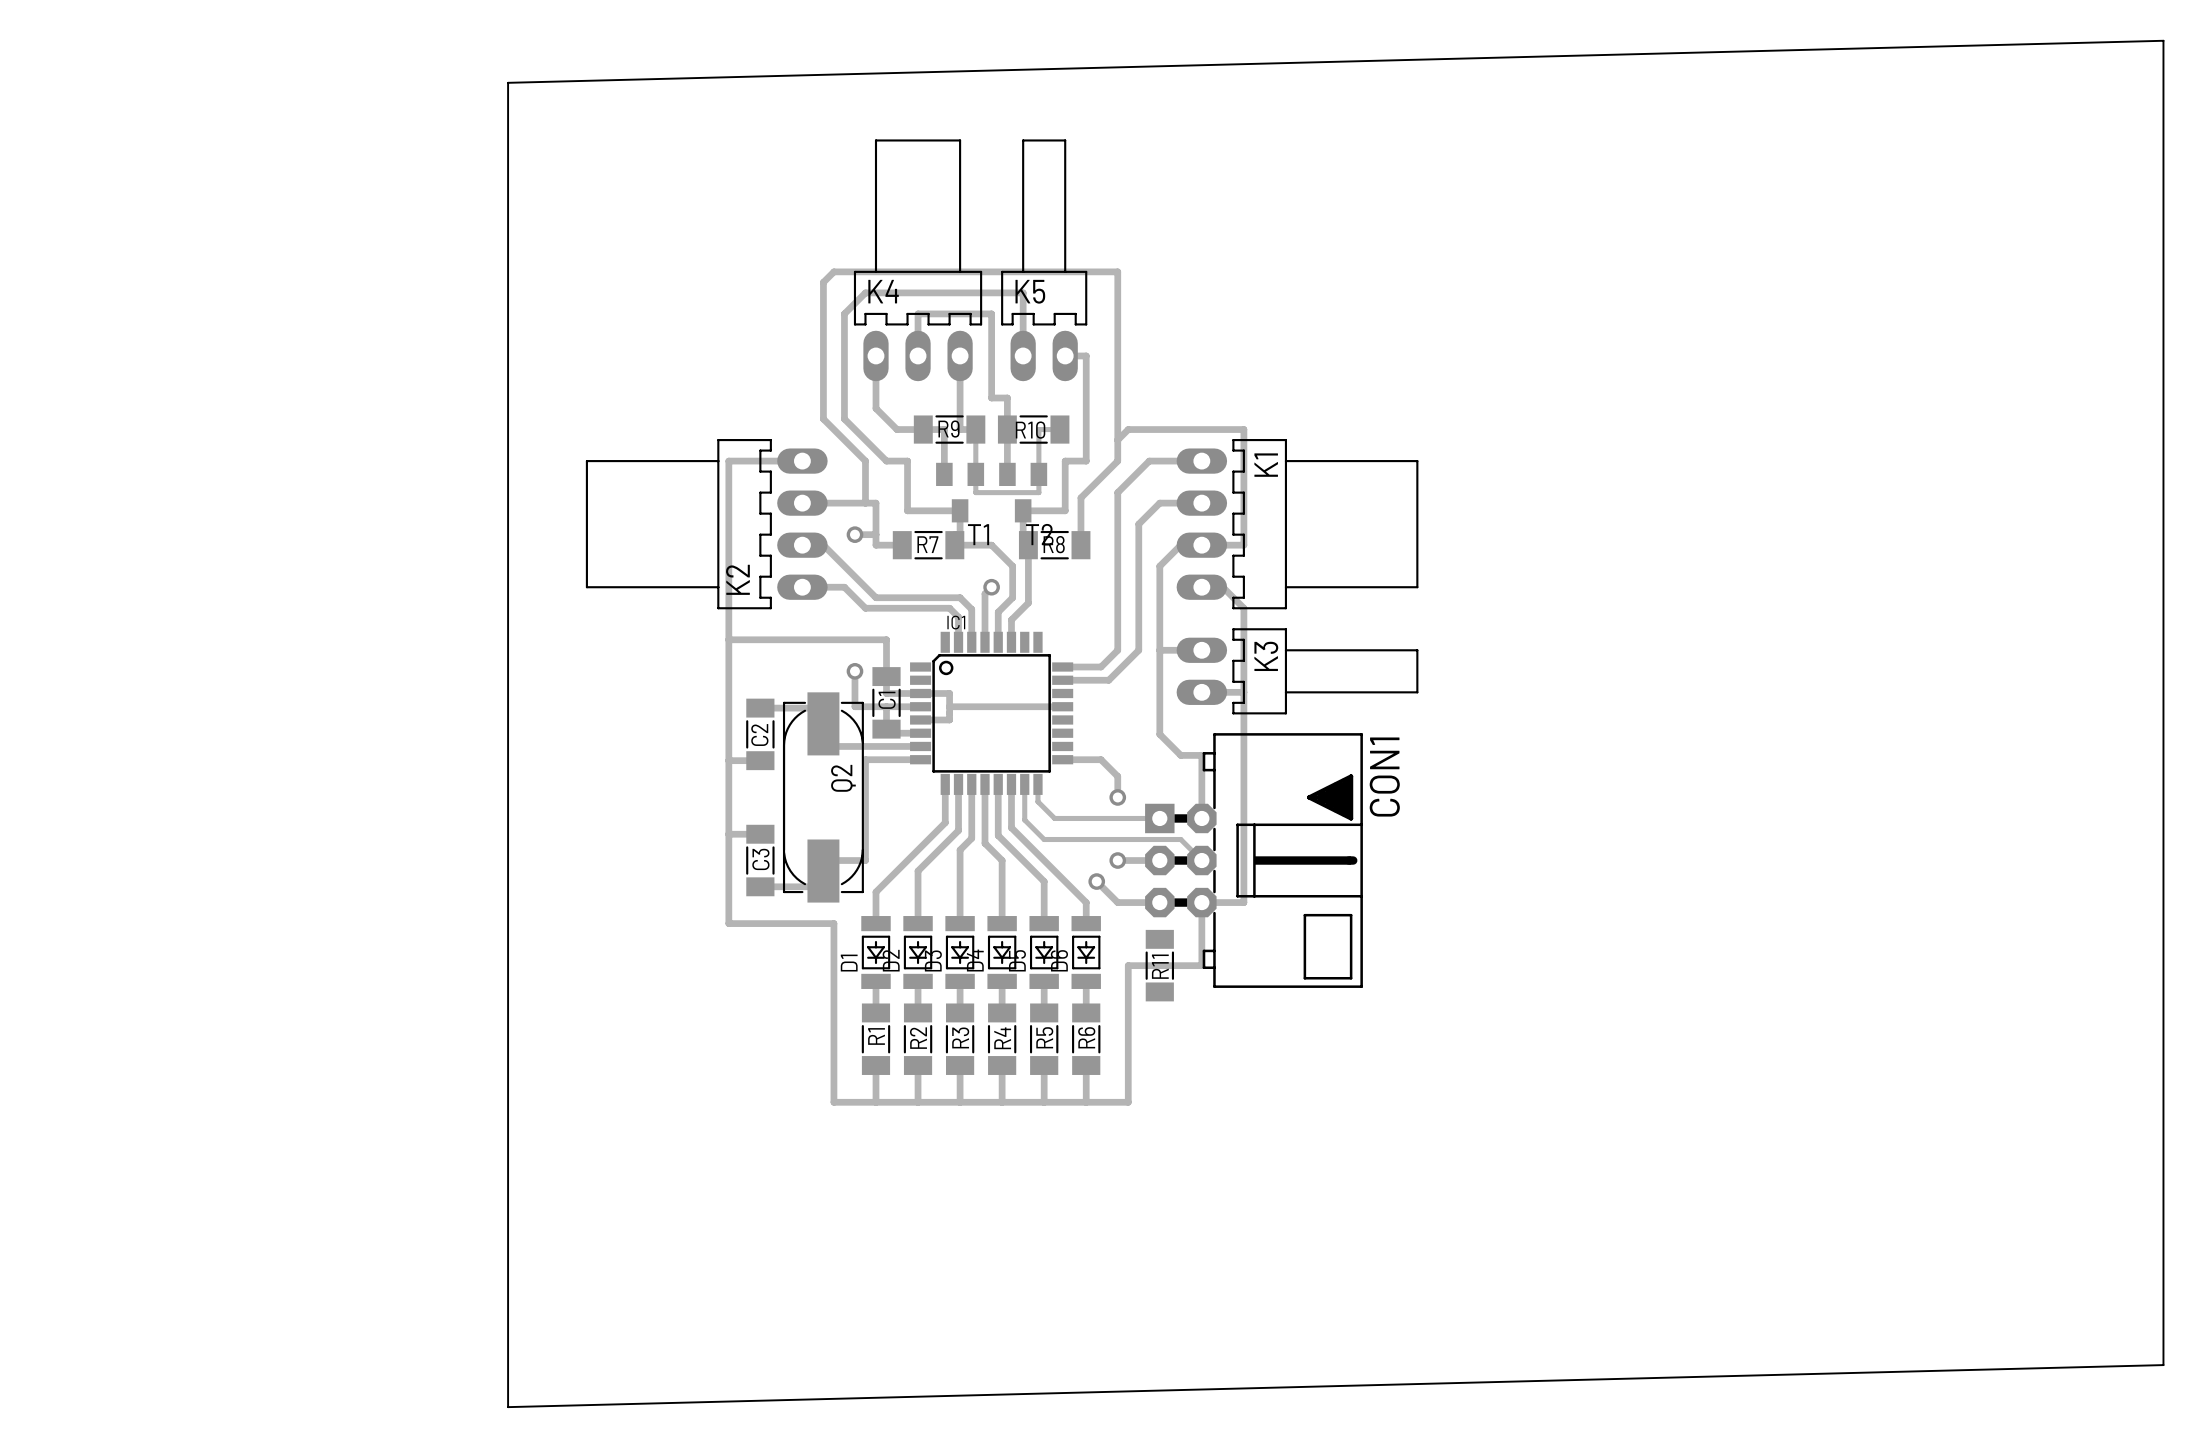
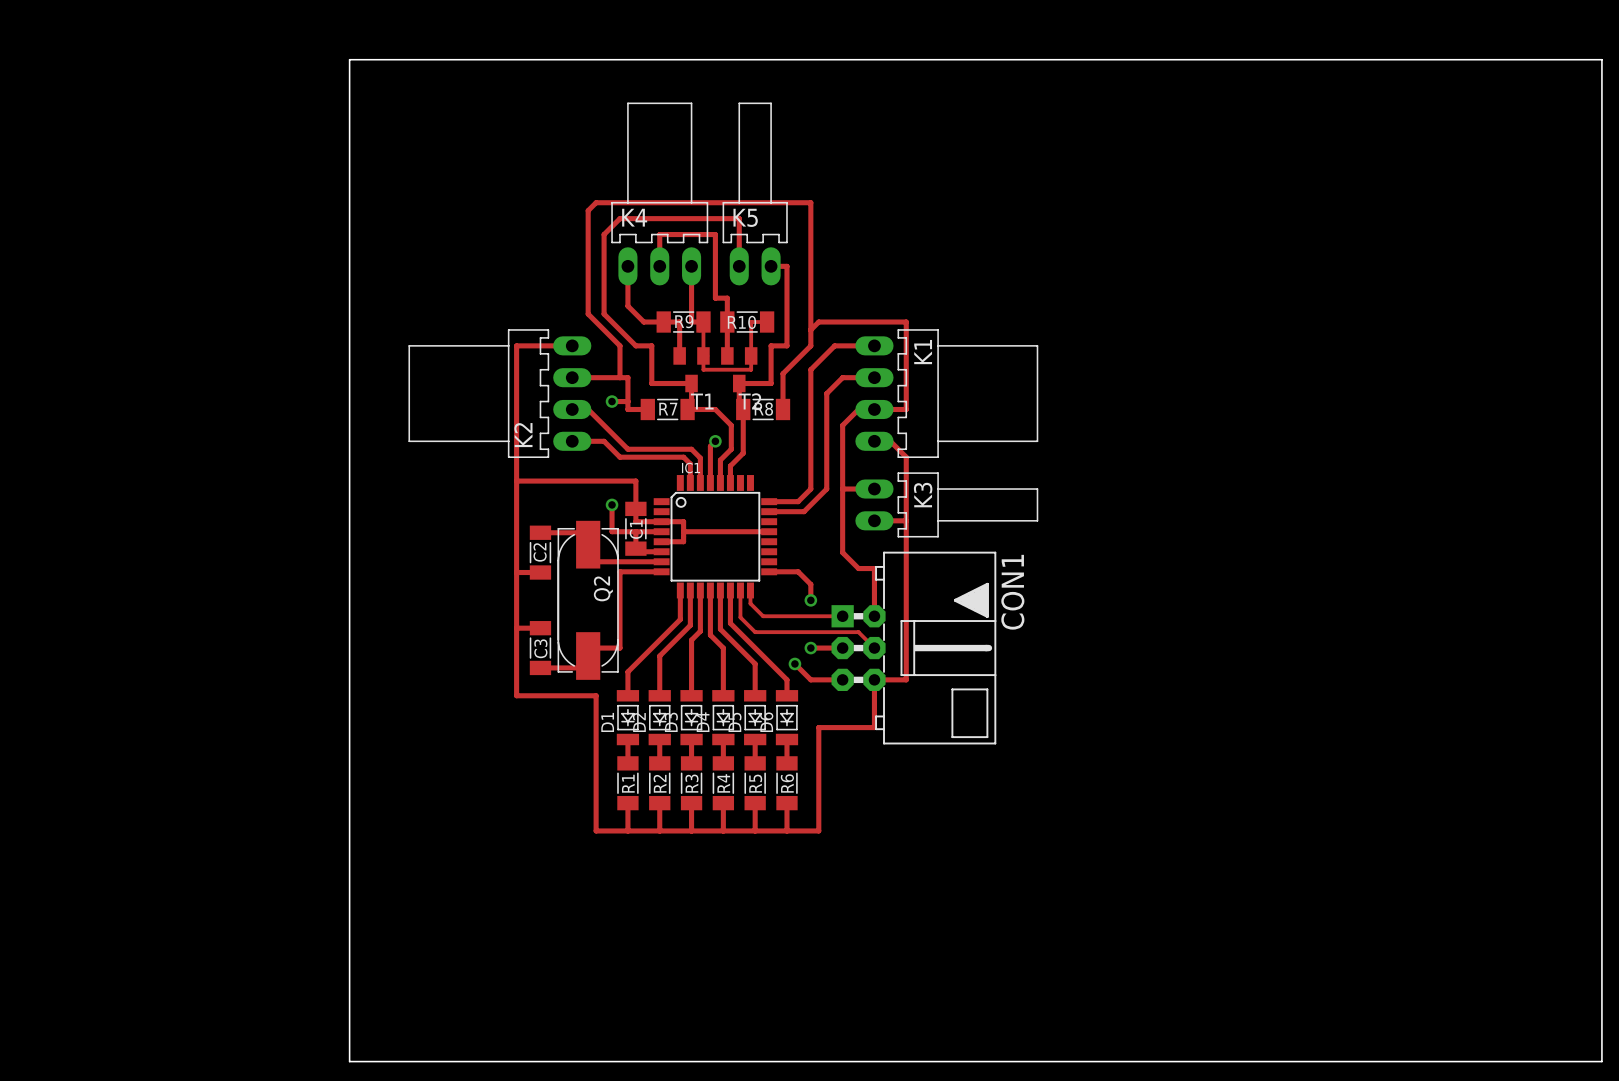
board edge: (508, 82) (2163, 40) (2163, 82) -> (349, 59) (1601, 59)
R11: (1159, 965) -> none
board edge: (2163, 1365) (508, 1407) -> (1601, 1029) (1601, 1061) (349, 1061)

